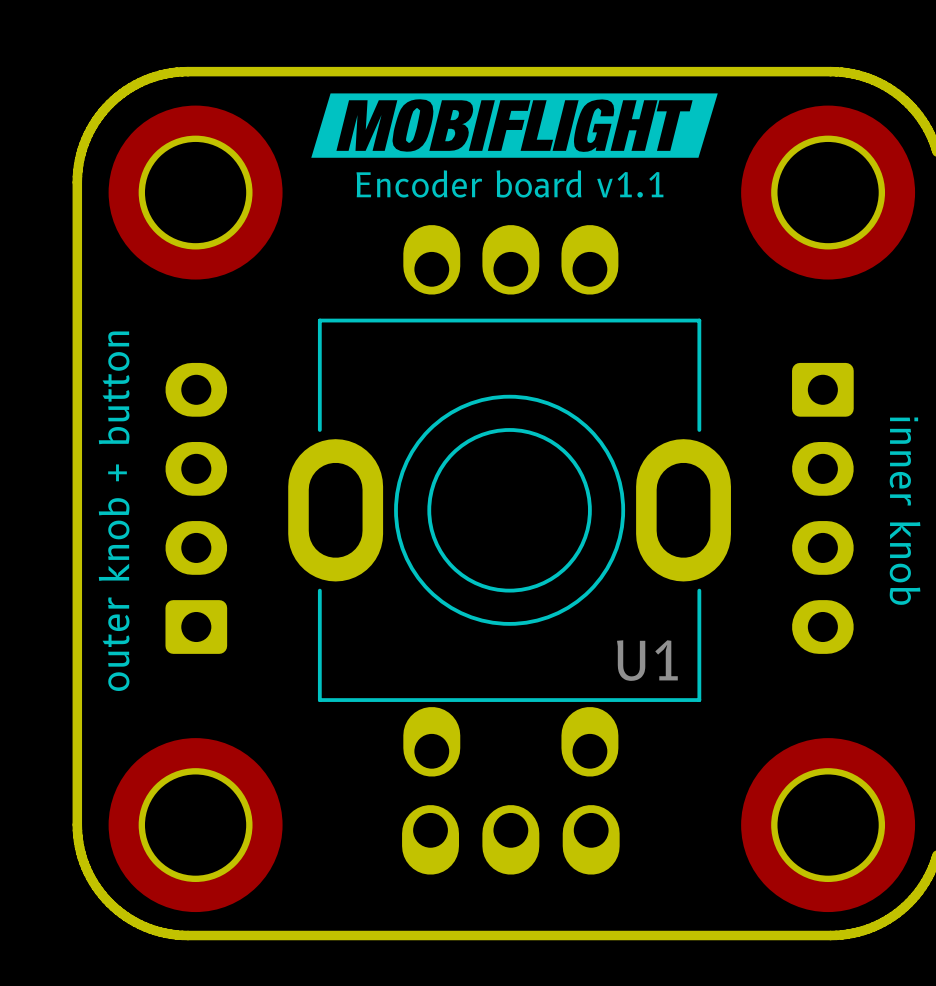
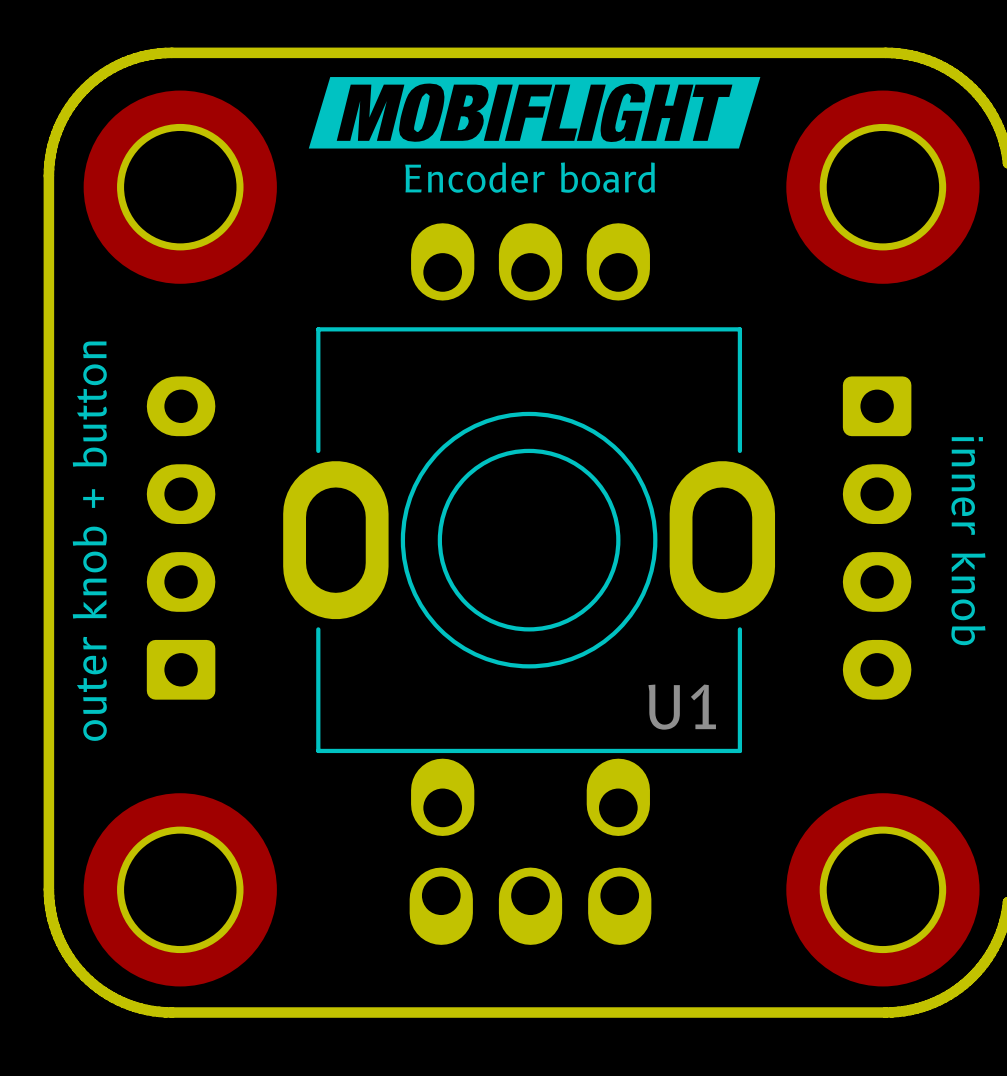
text: Encoder board v1.1 (509, 183) -> Encoder board (530, 177)

